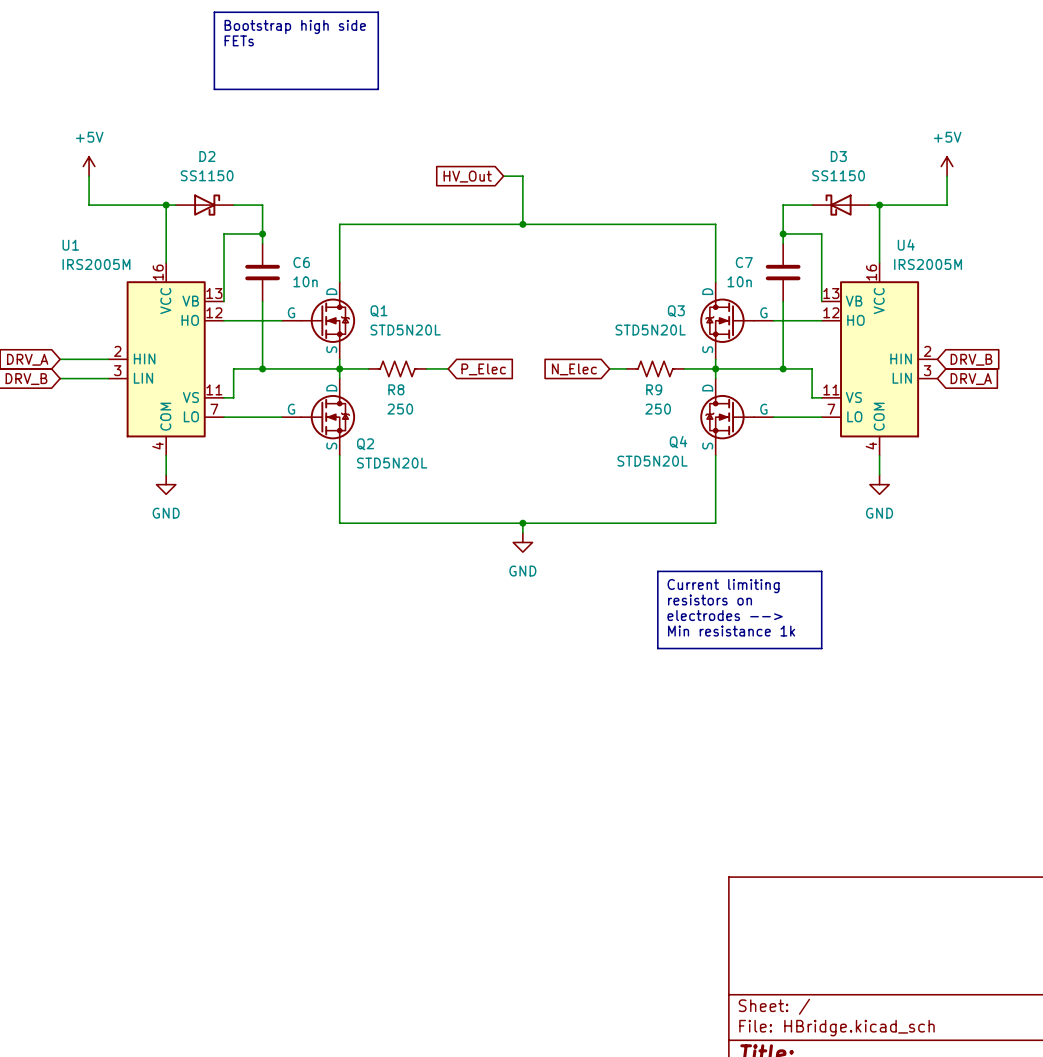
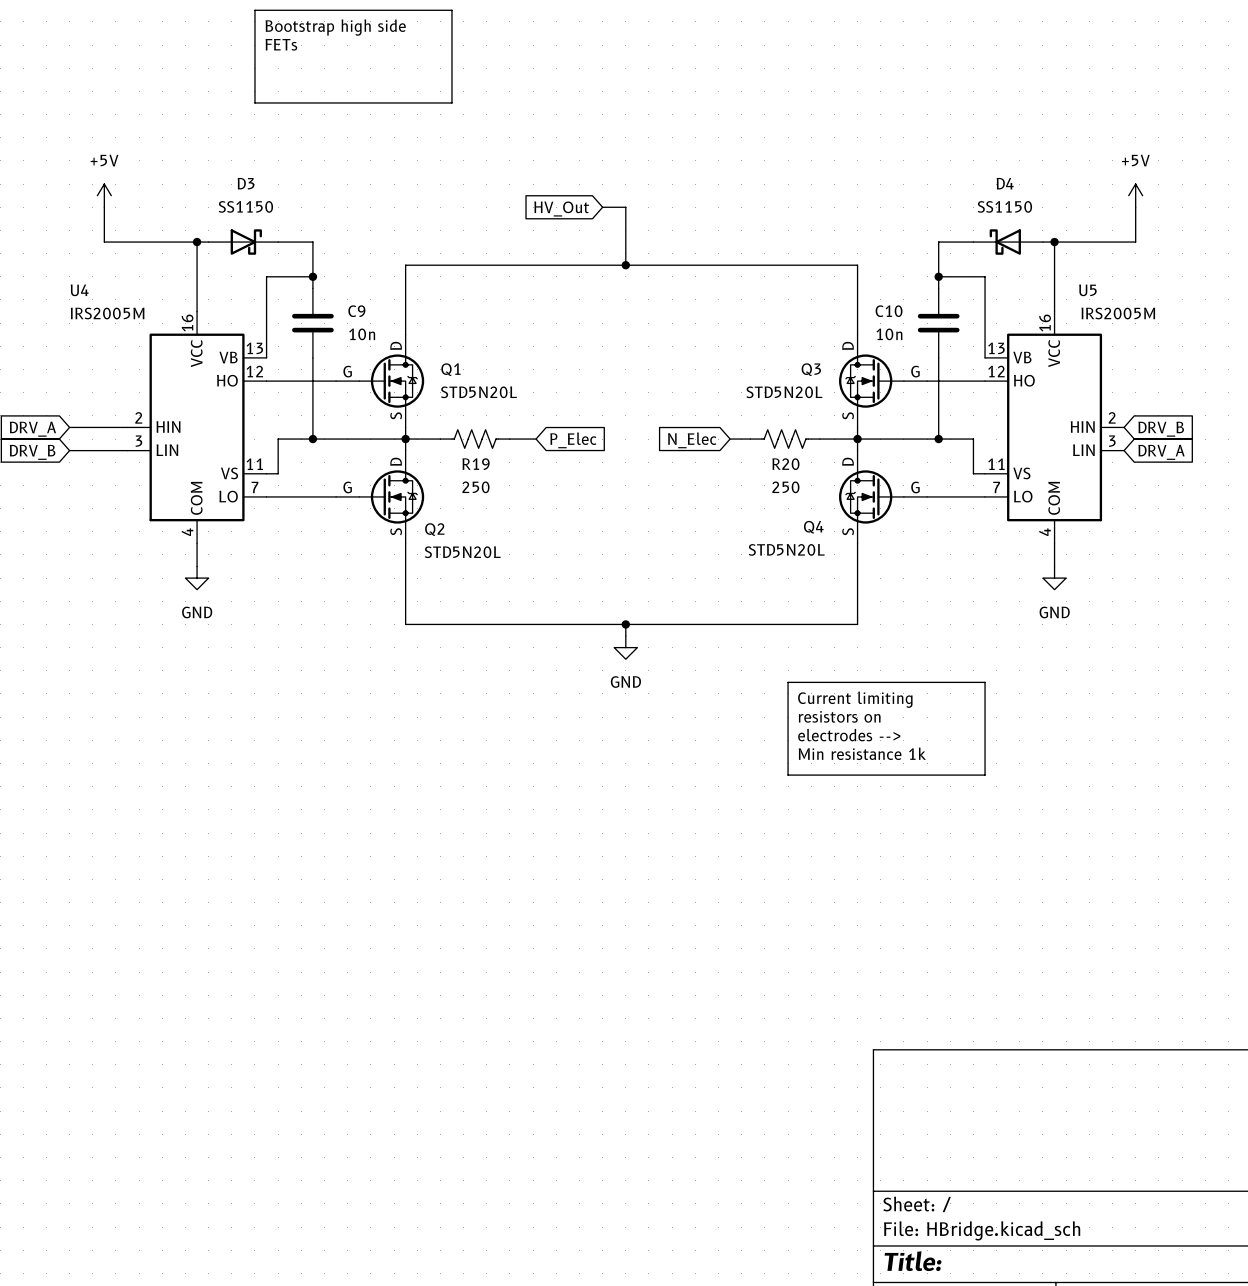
D2 name: D2 (207, 156) -> D3 (246, 183)
D3 name: D3 (838, 156) -> D4 (1005, 183)
U4 name: U4 (906, 244) -> U5 (1087, 290)
U1 name: U1 (70, 245) -> U4 (79, 290)
C6 name: C6 (301, 262) -> C9 (356, 311)
C7 name: C7 (744, 262) -> C10 (889, 311)
R8 name: R8 (396, 389) -> R19 (476, 464)
R9 name: R9 (654, 389) -> R20 (785, 464)

